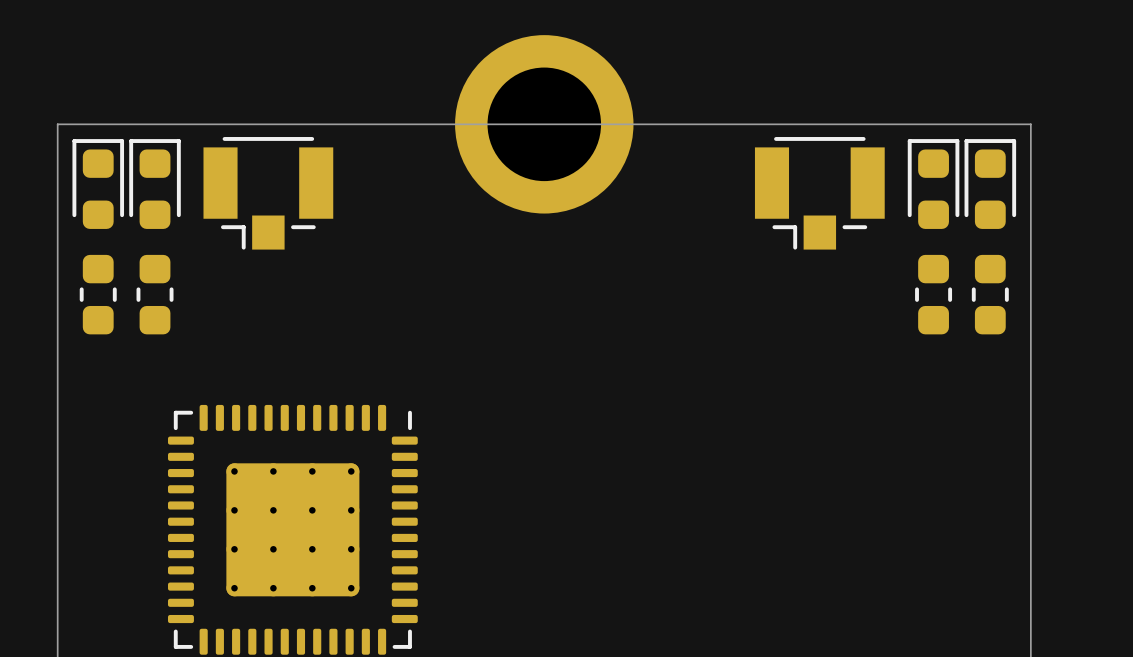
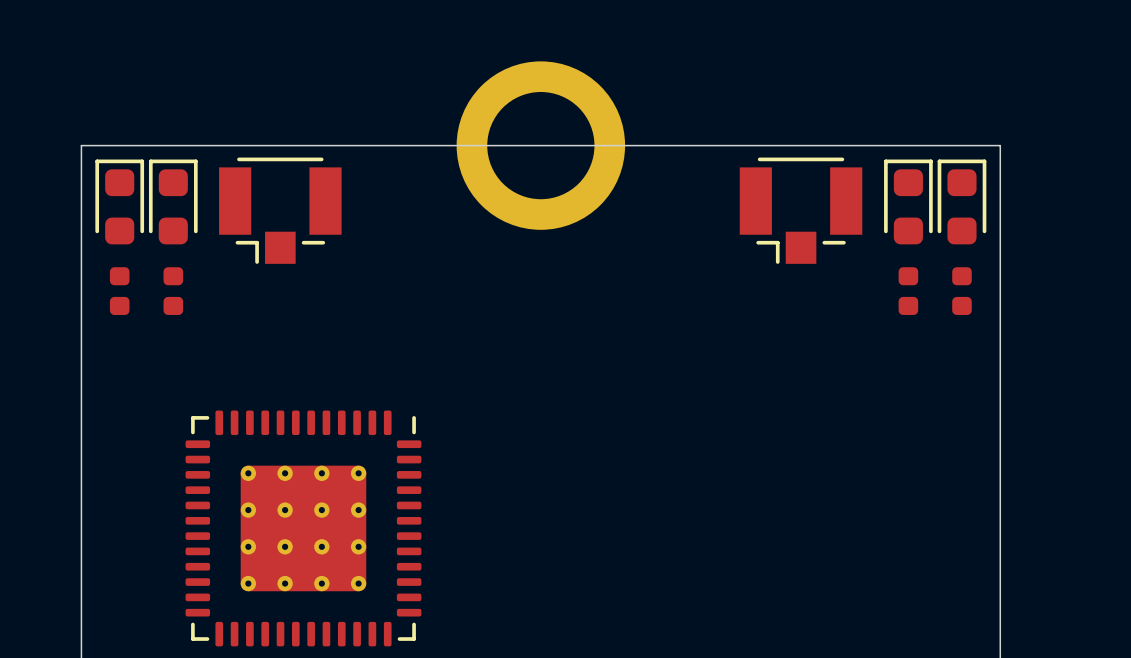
part footprint: [79, 254, 117, 335] -> [109, 267, 130, 315]
part footprint: [136, 254, 174, 335] -> [163, 267, 184, 315]
part footprint: [915, 254, 953, 335] -> [898, 267, 919, 315]
part footprint: [971, 254, 1009, 335] -> [952, 267, 972, 315]

